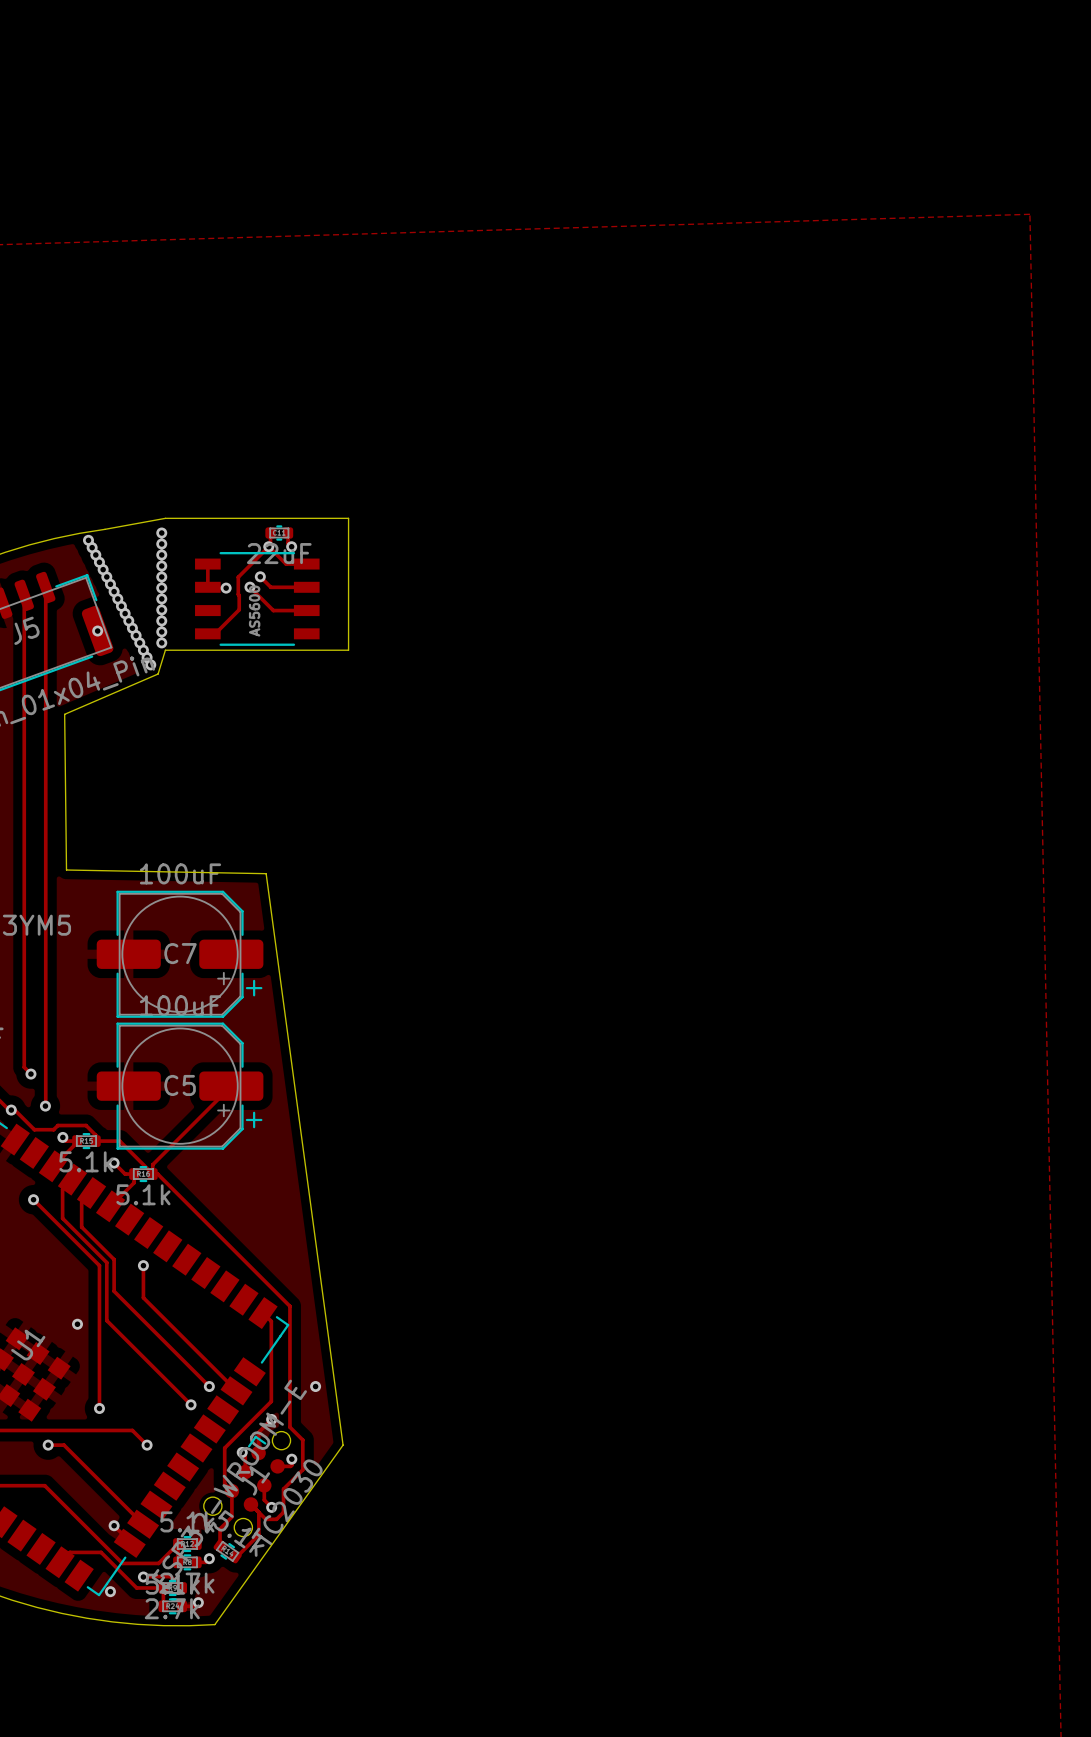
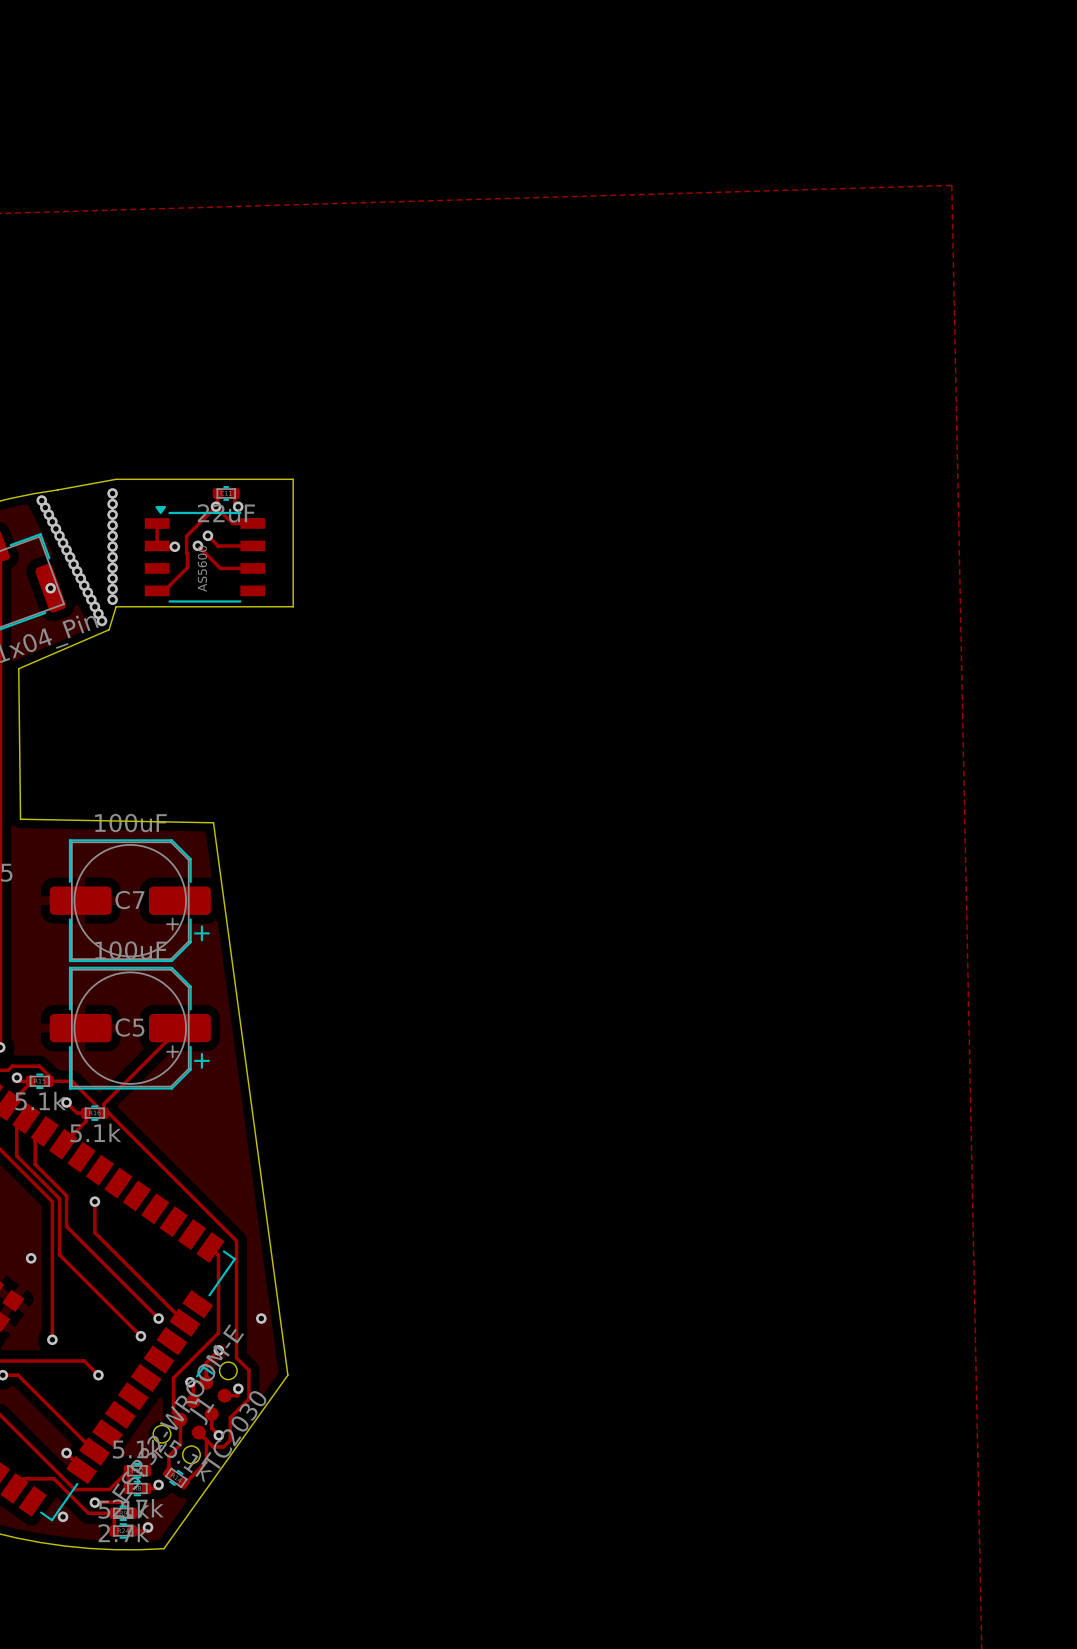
part footprint: [195, 551, 320, 646] -> [144, 506, 266, 603]

